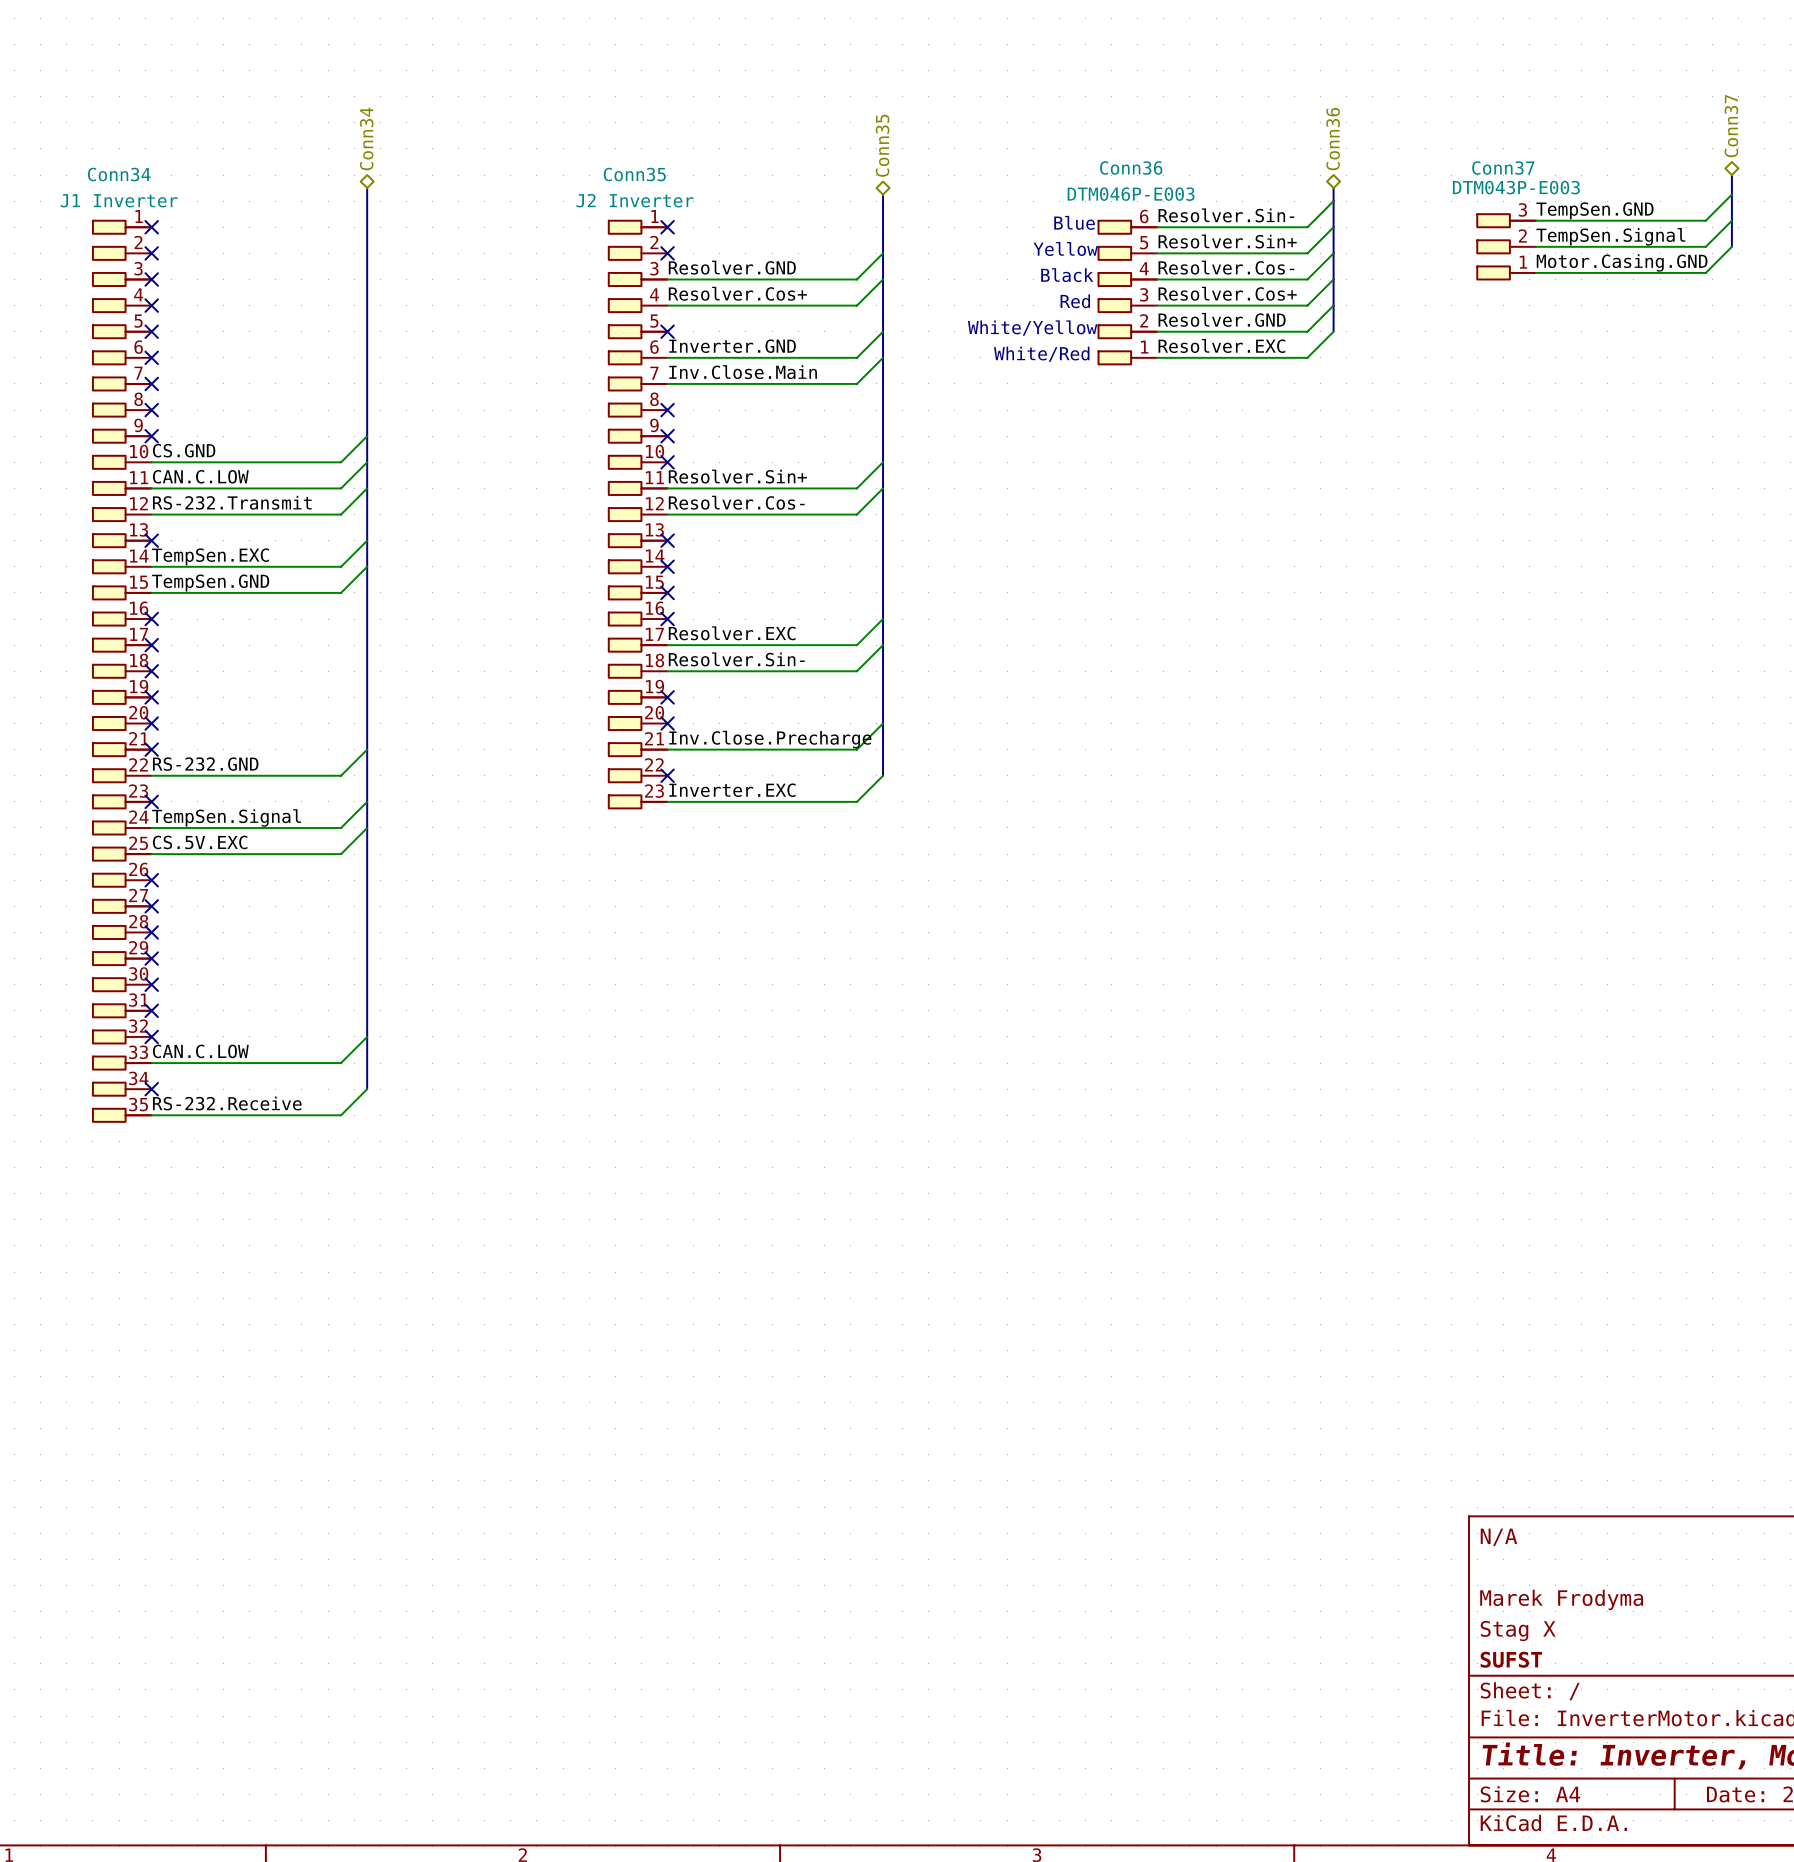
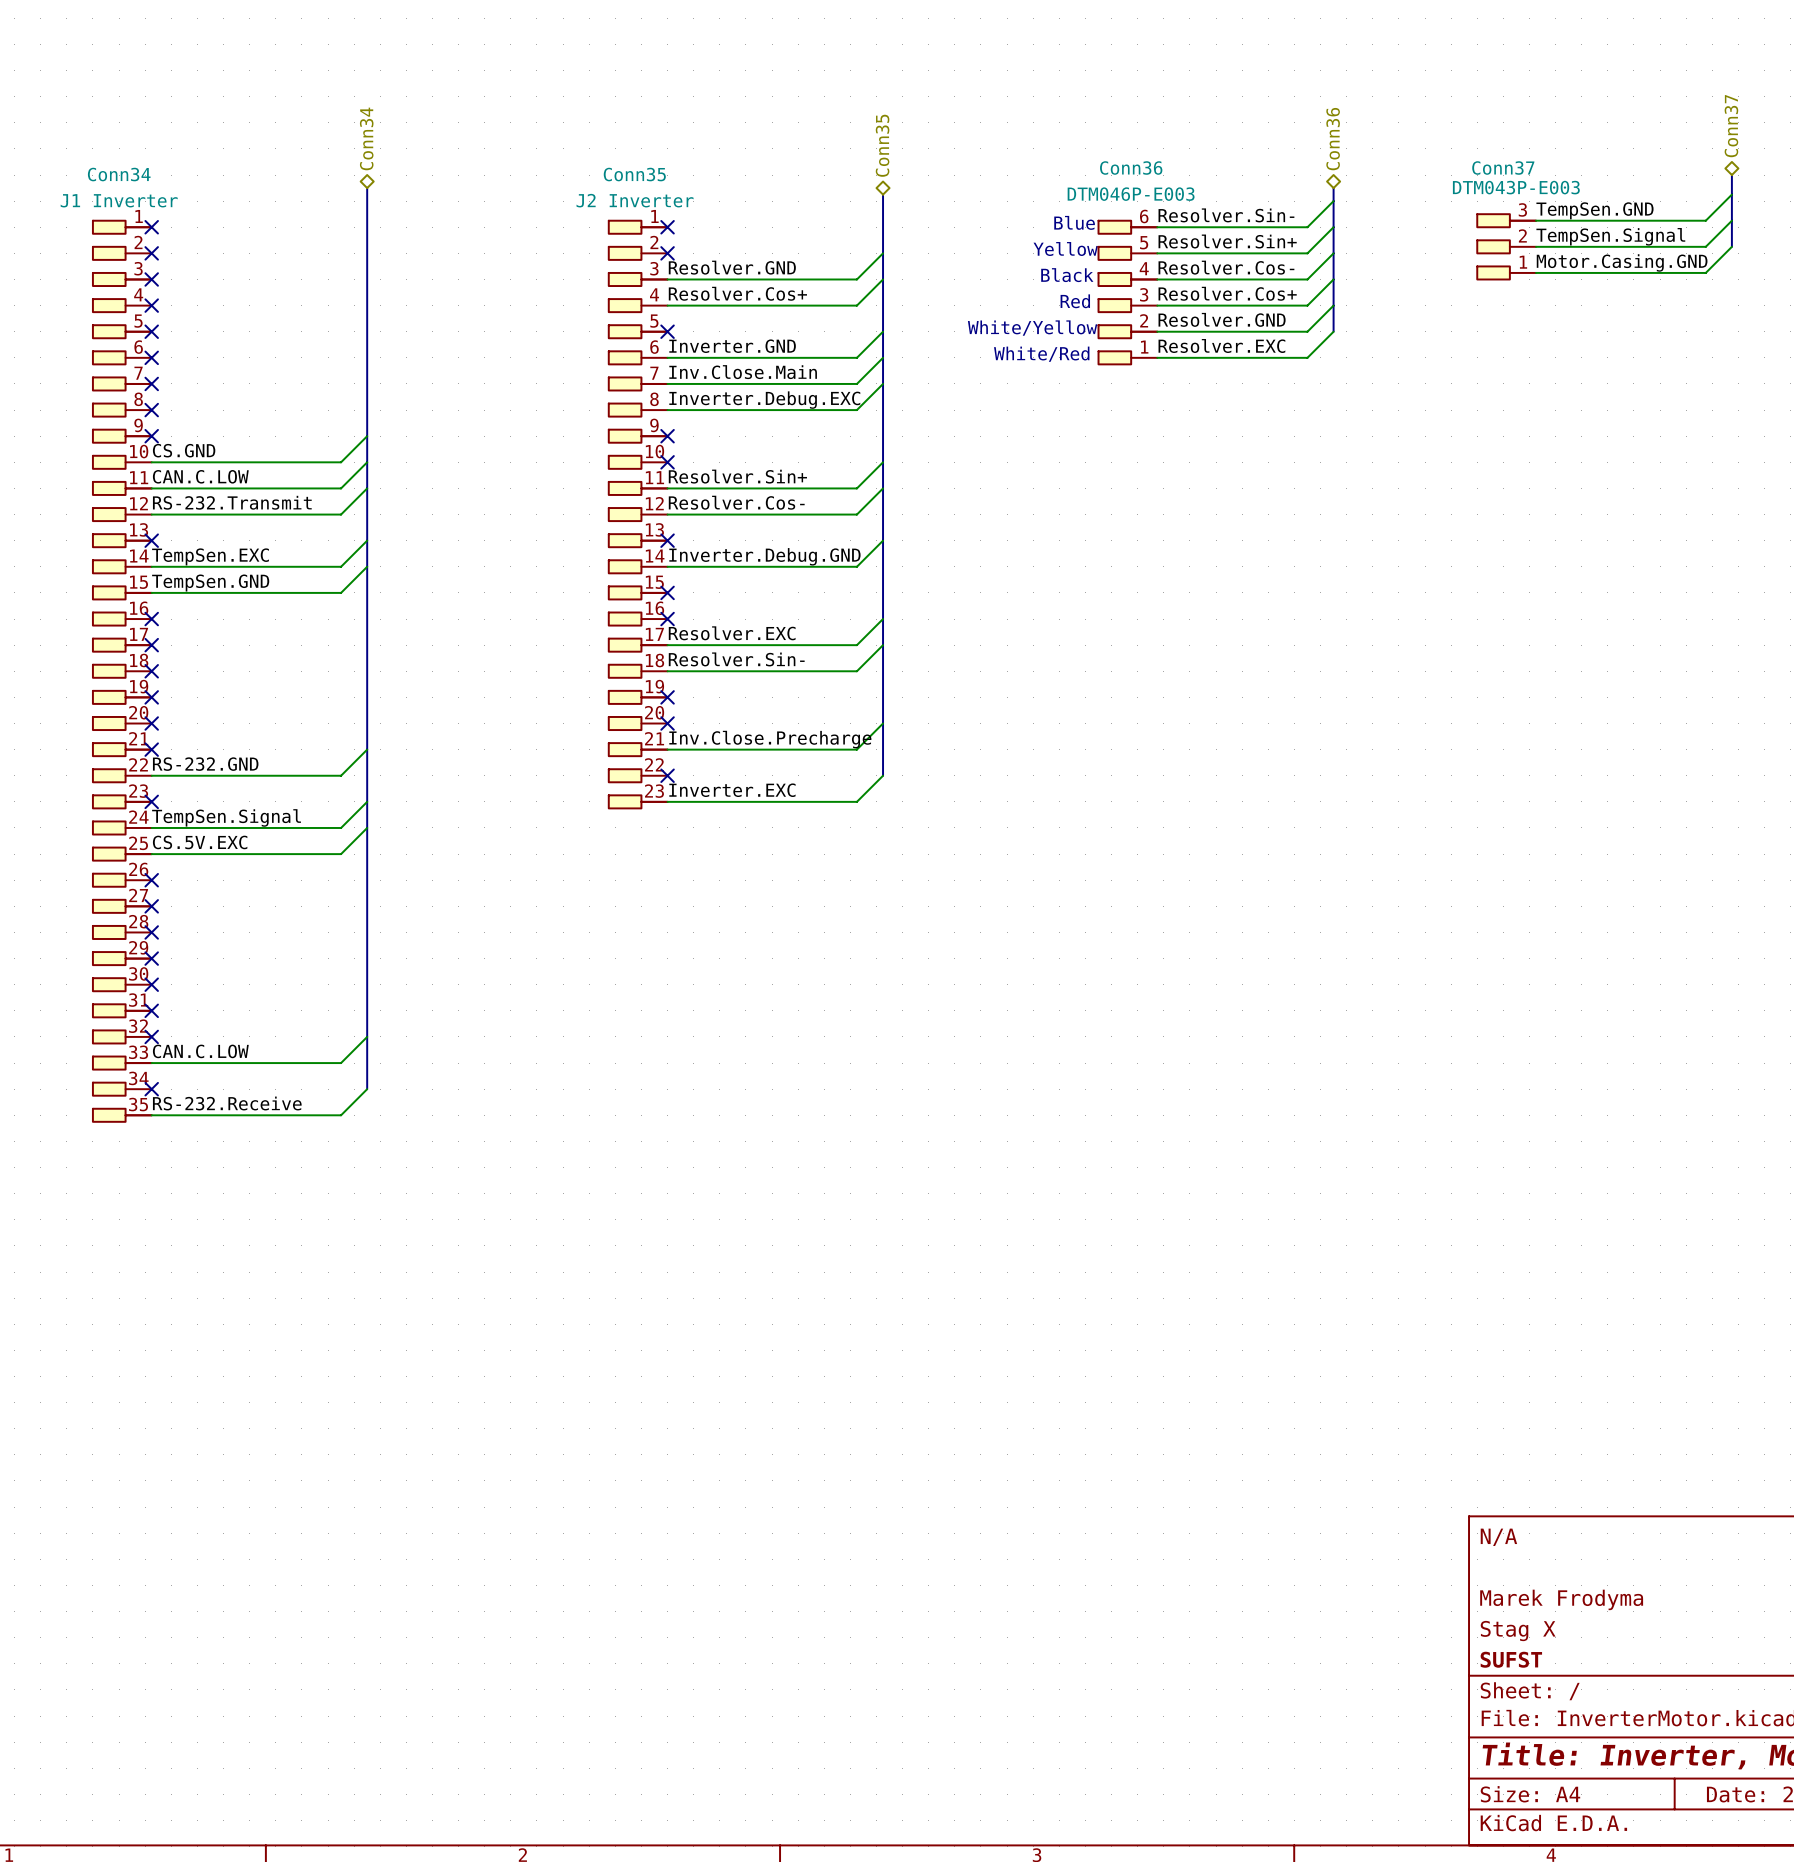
wire: none -> (883, 383) (856, 410) (667, 410)
label: none -> Inverter.Debug.EXC (764, 400)
no-connect mark: (667, 410) -> none
wire: none -> (883, 540) (856, 566) (667, 566)
label: none -> Inverter.Debug.GND (764, 556)
no-connect mark: (667, 566) -> none

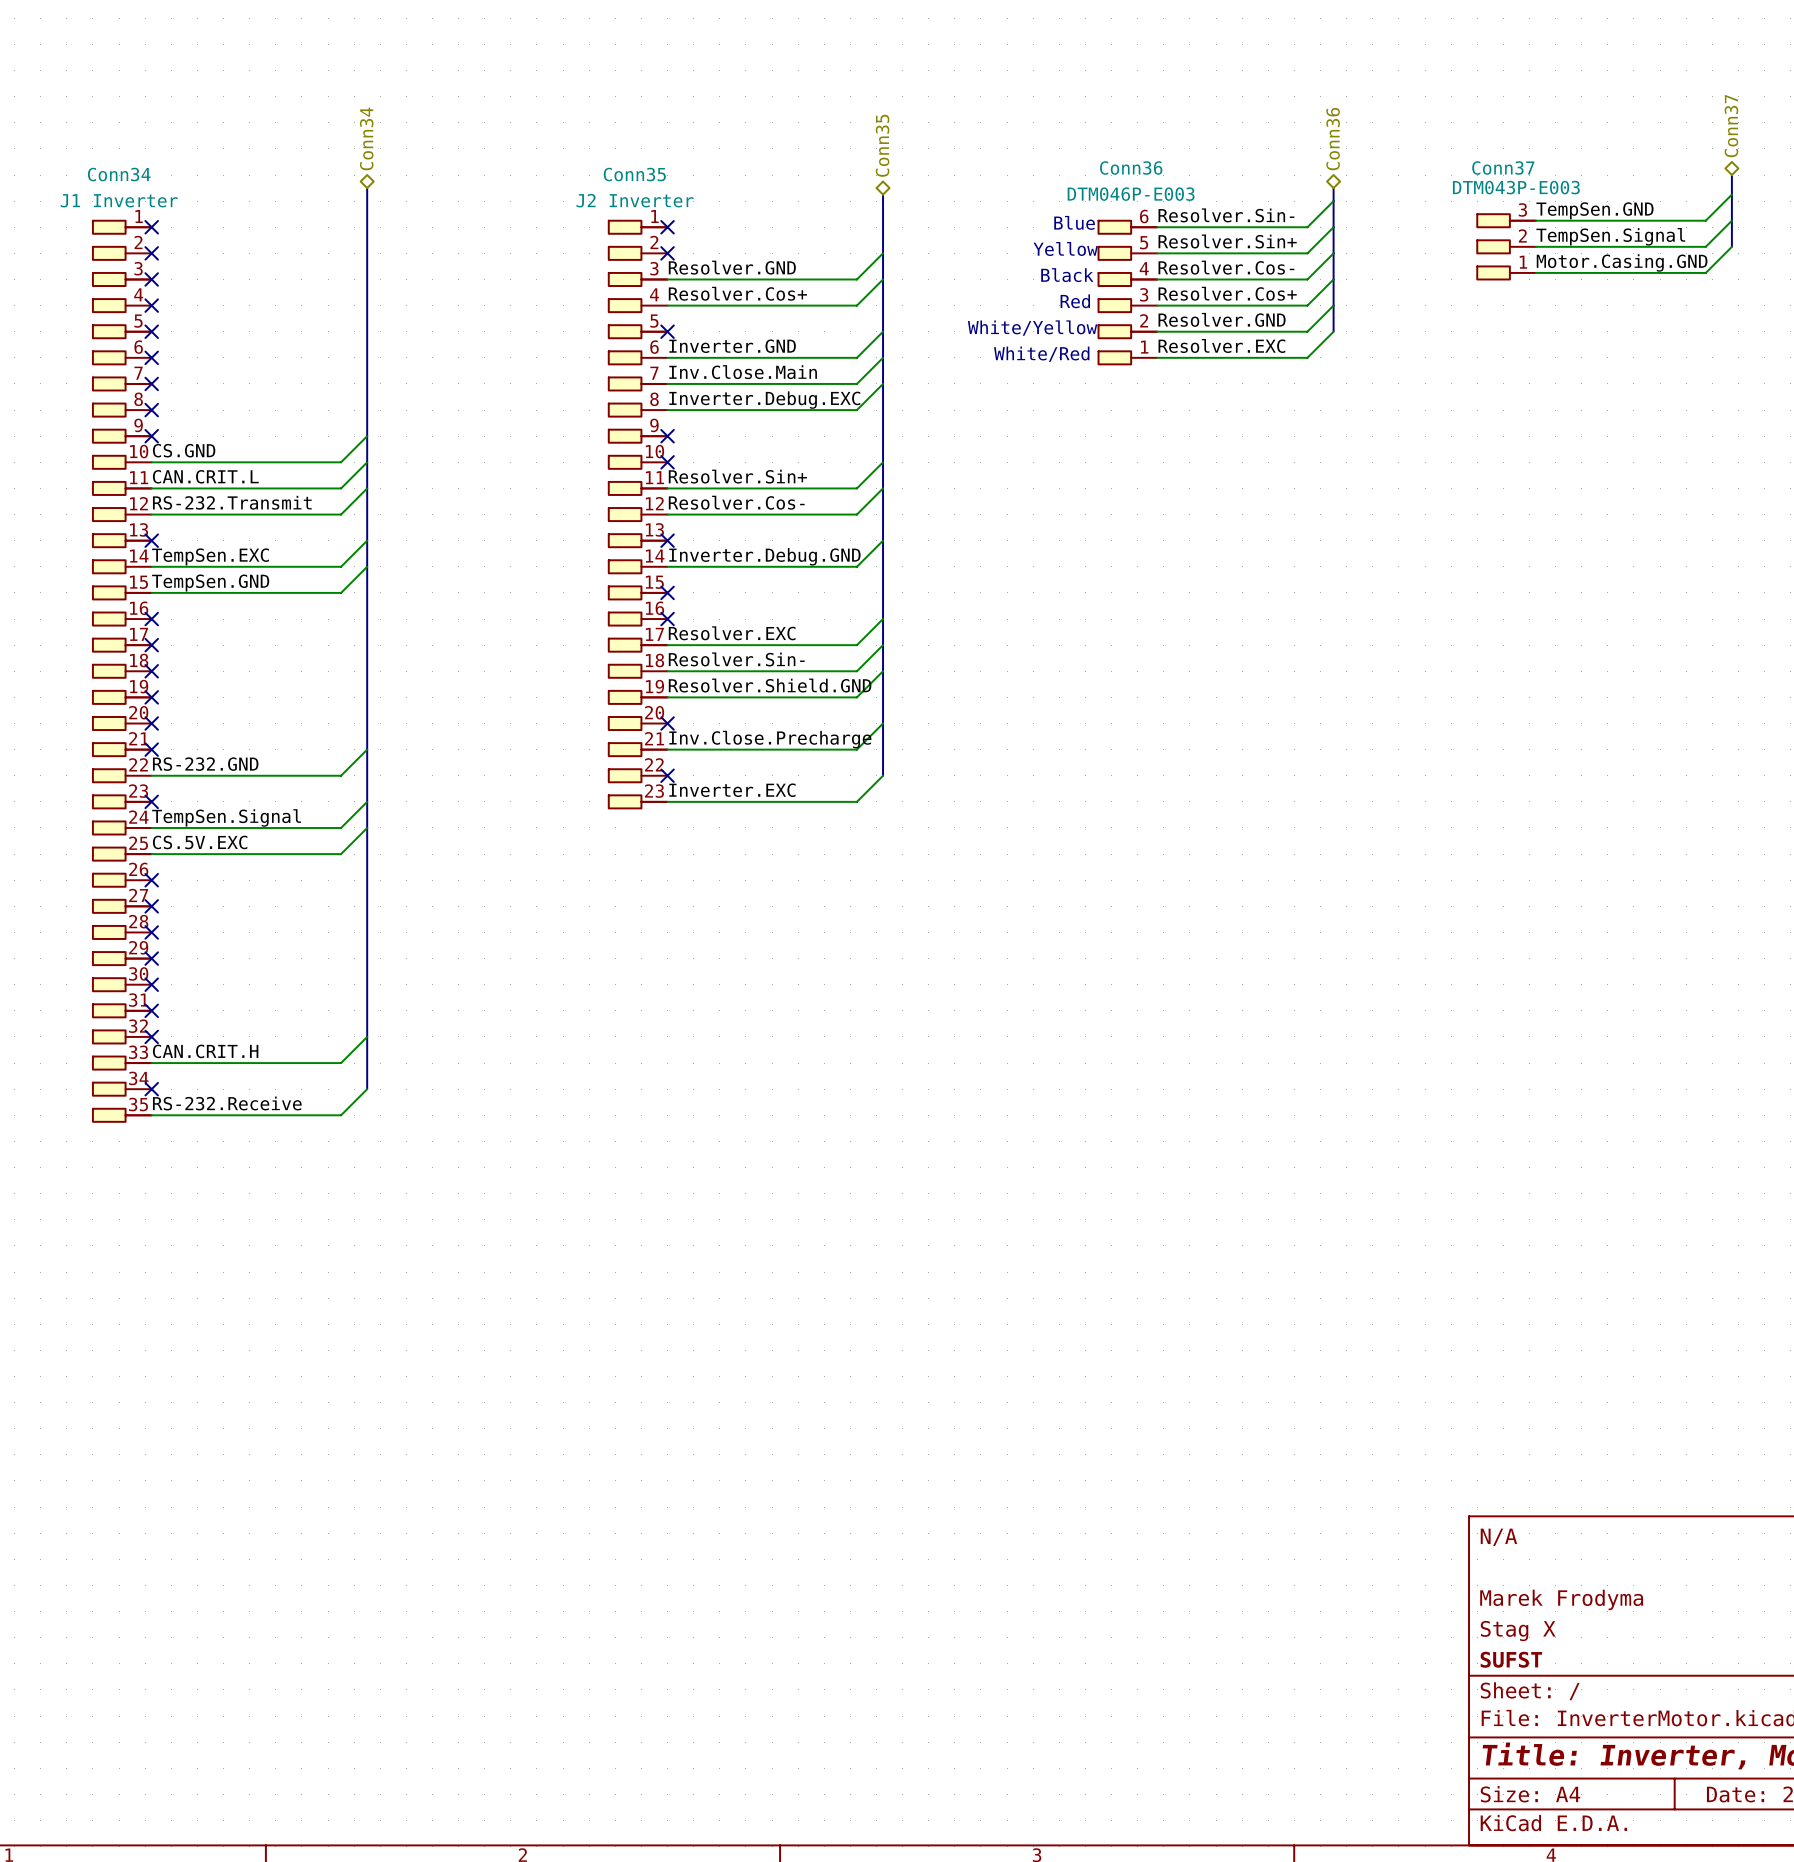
label: CAN.C.LOW (200, 476) -> CAN.CRIT.L (205, 476)
wire: none -> (883, 671) (856, 697) (667, 697)
label: none -> Resolver.Shield.GND (770, 685)
no-connect mark: (667, 697) -> none
label: CAN.C.LOW (200, 1051) -> CAN.CRIT.H (205, 1051)

